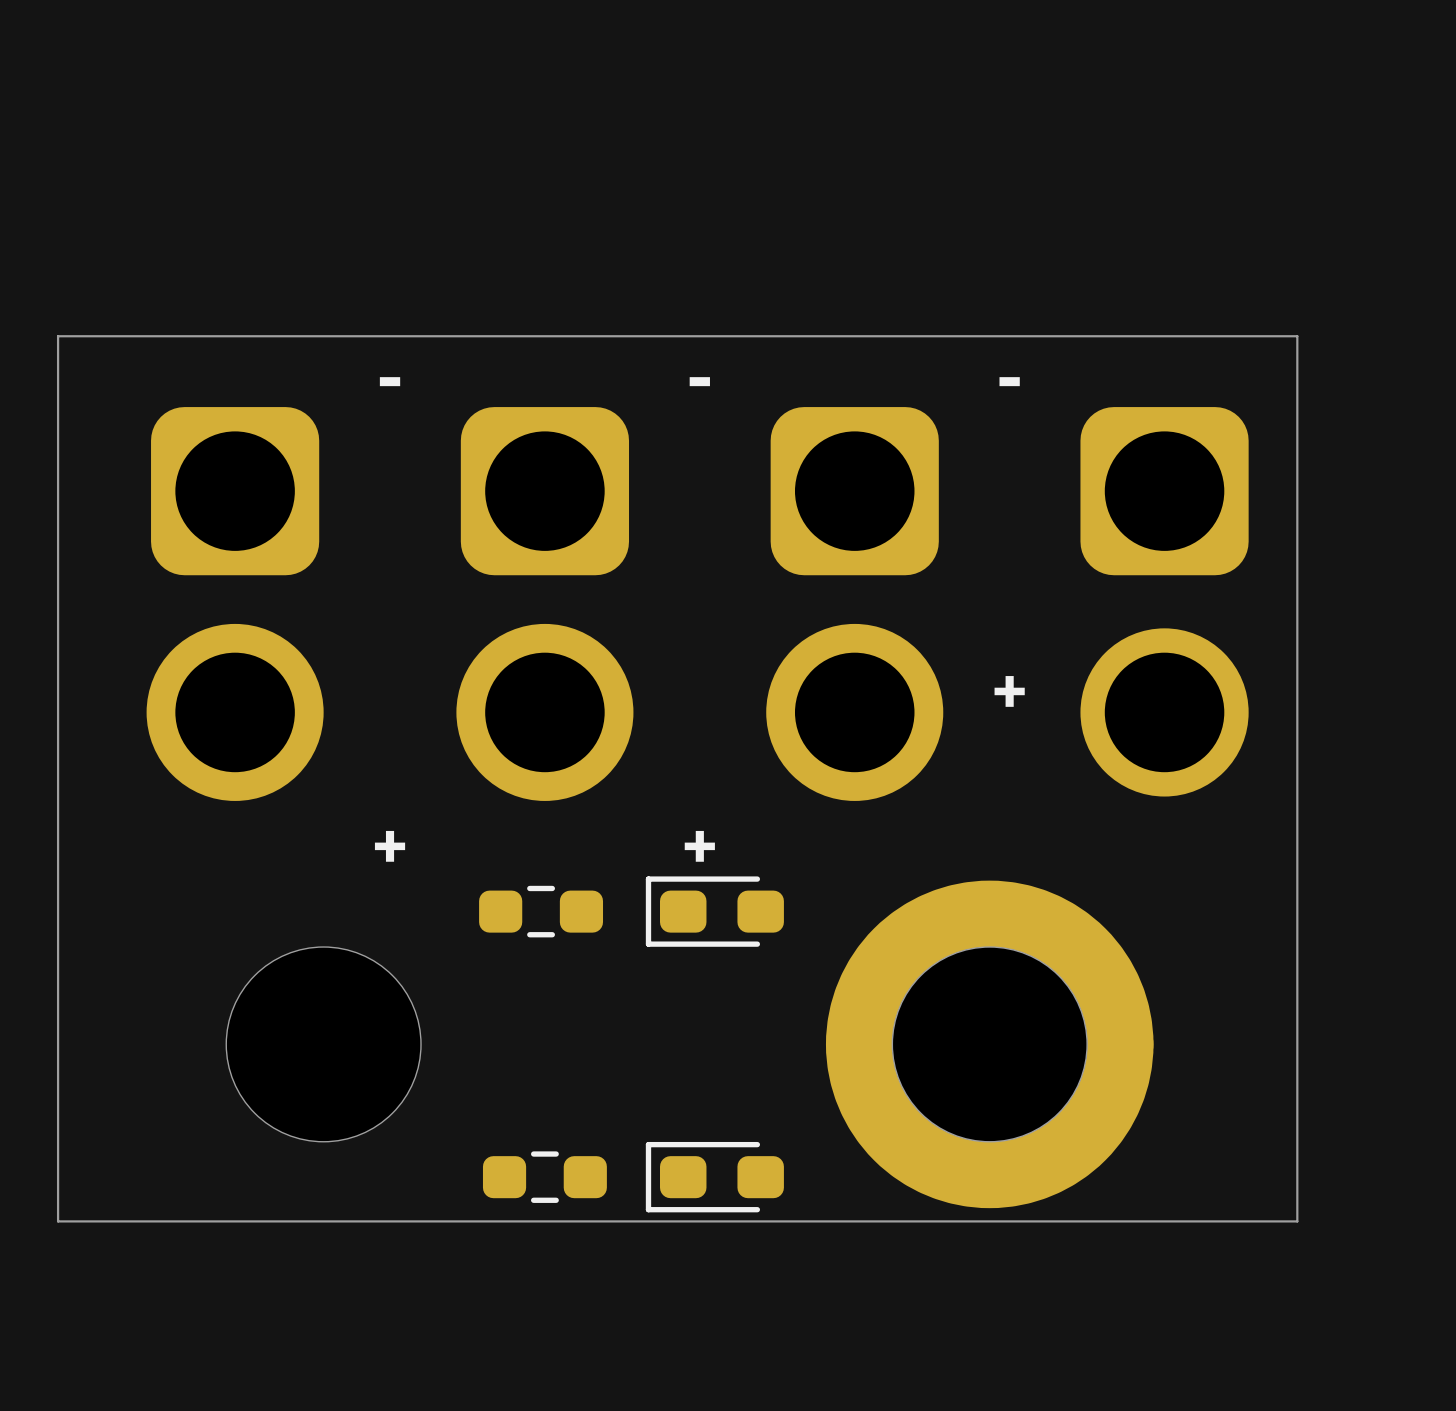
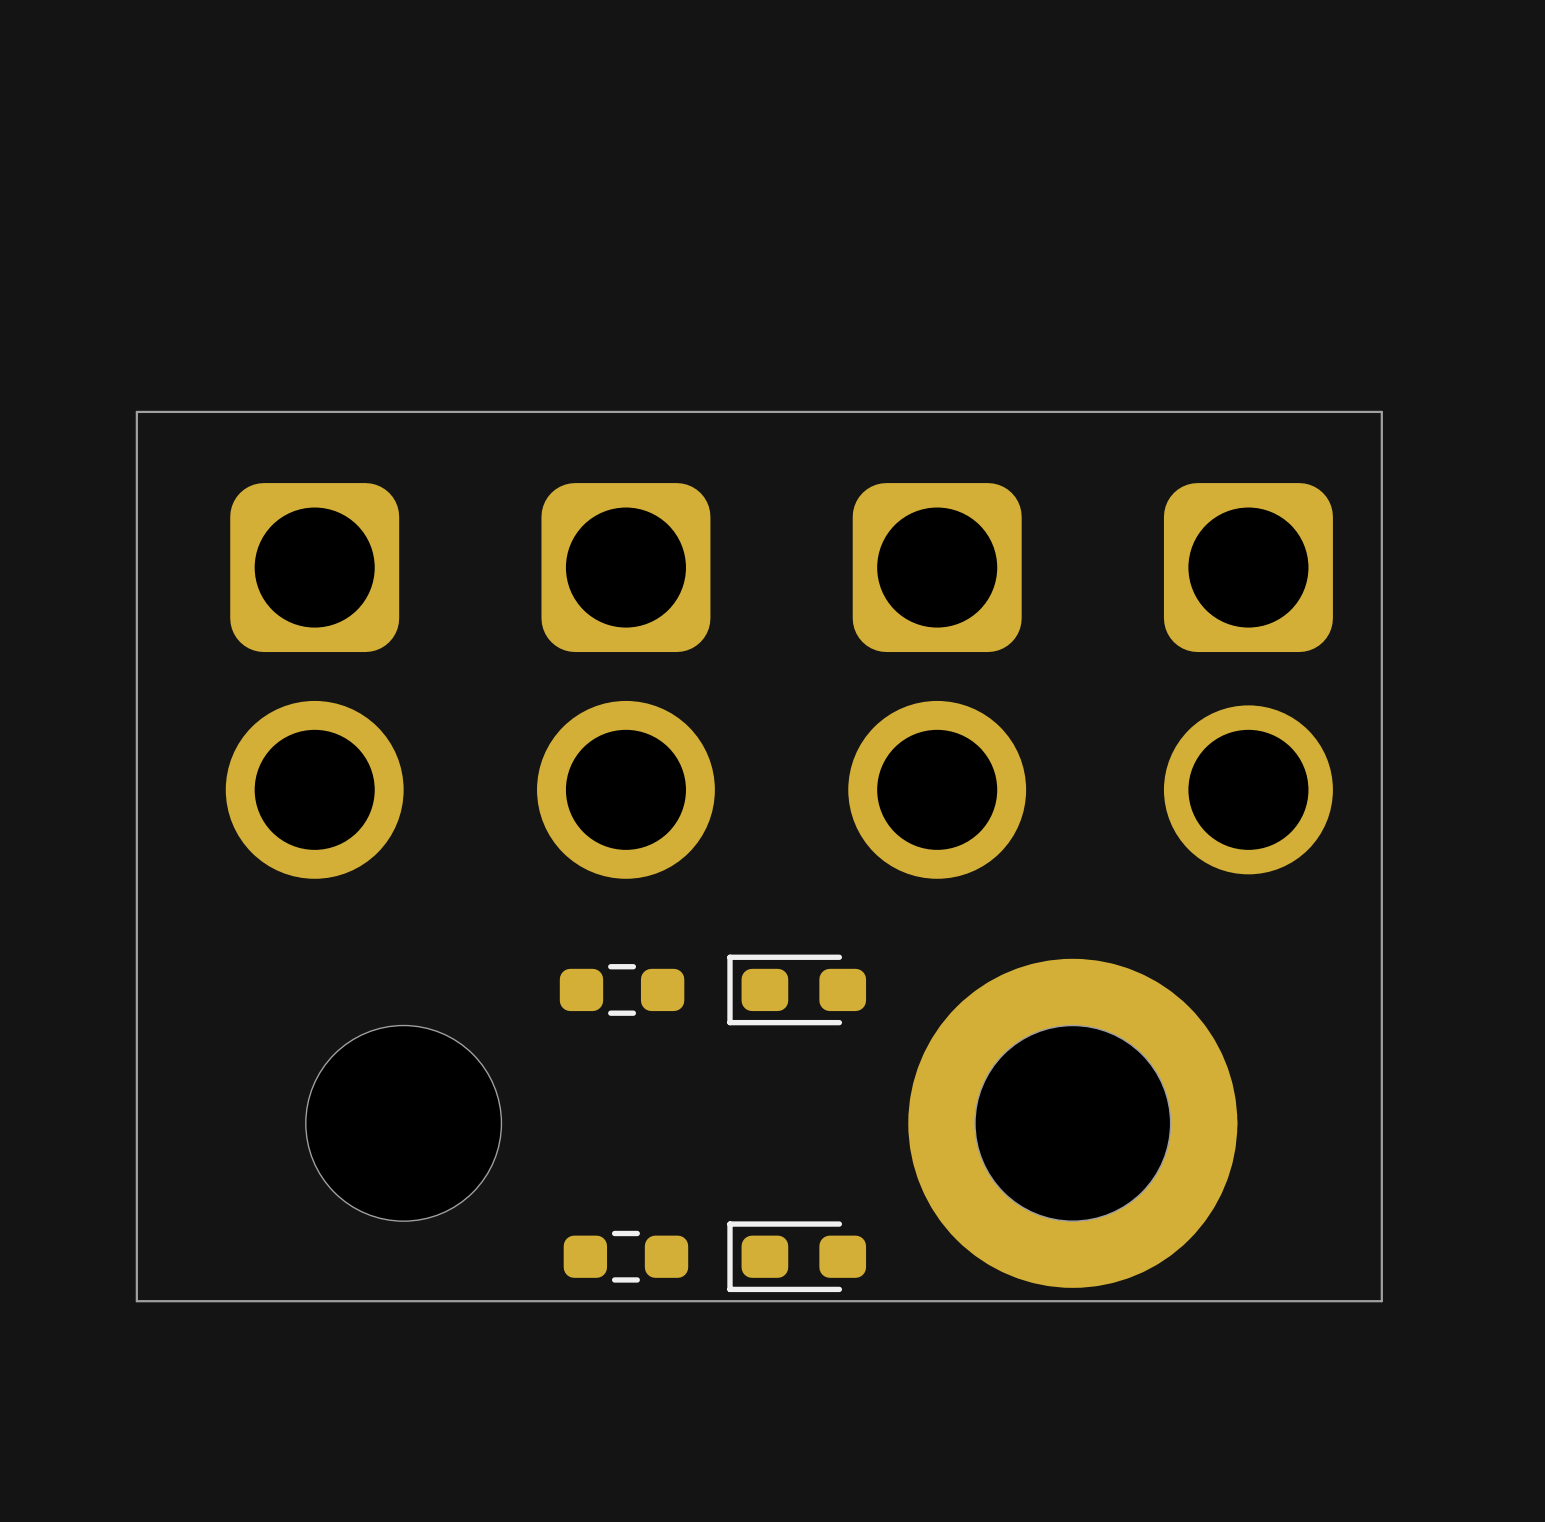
text: - (390, 381) -> none
text: - (699, 381) -> none
text: - (1009, 381) -> none
text: + (1009, 691) -> none
text: + (390, 846) -> none
text: + (699, 846) -> none

